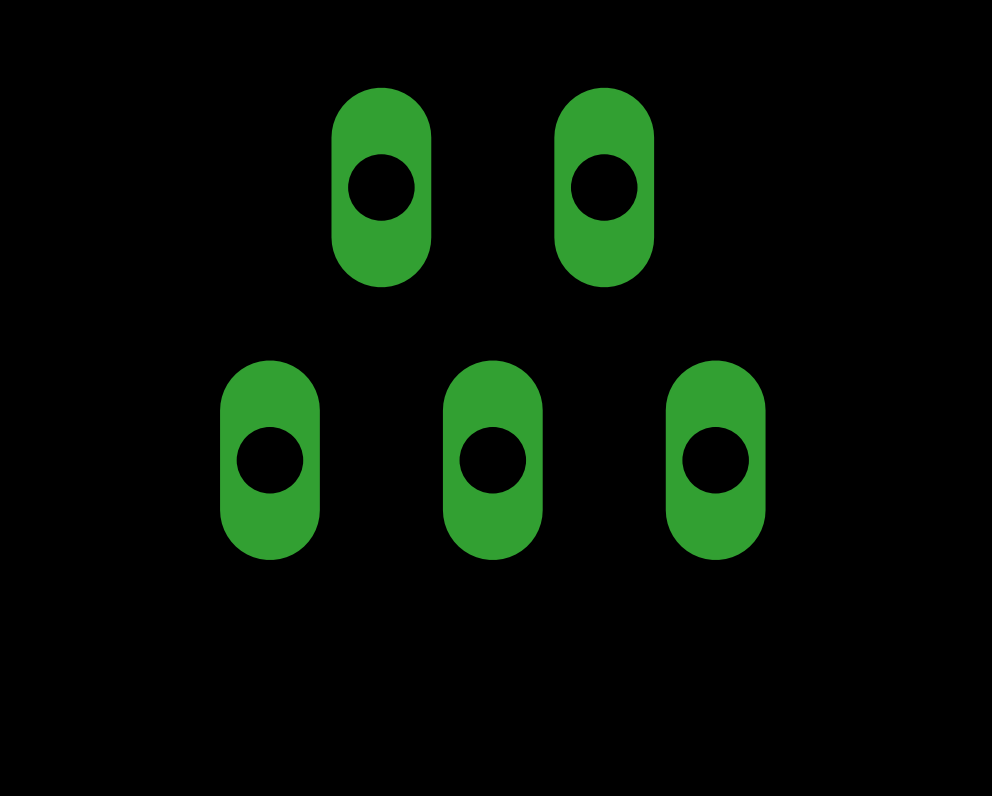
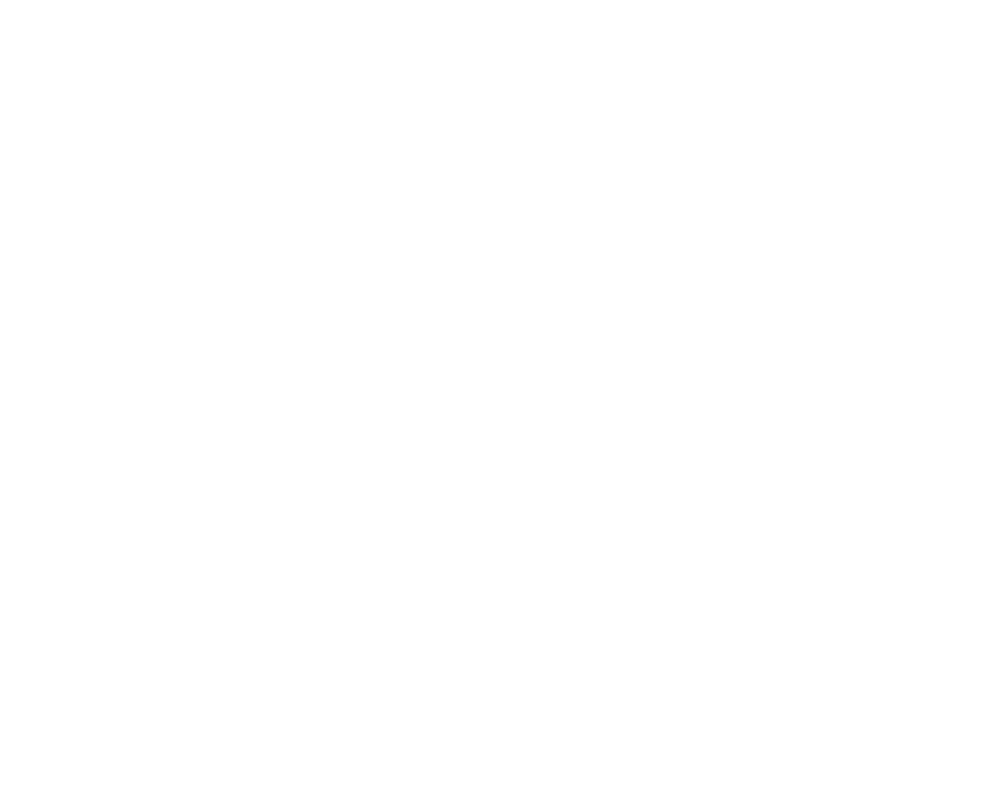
part: (492, 323) -> none

